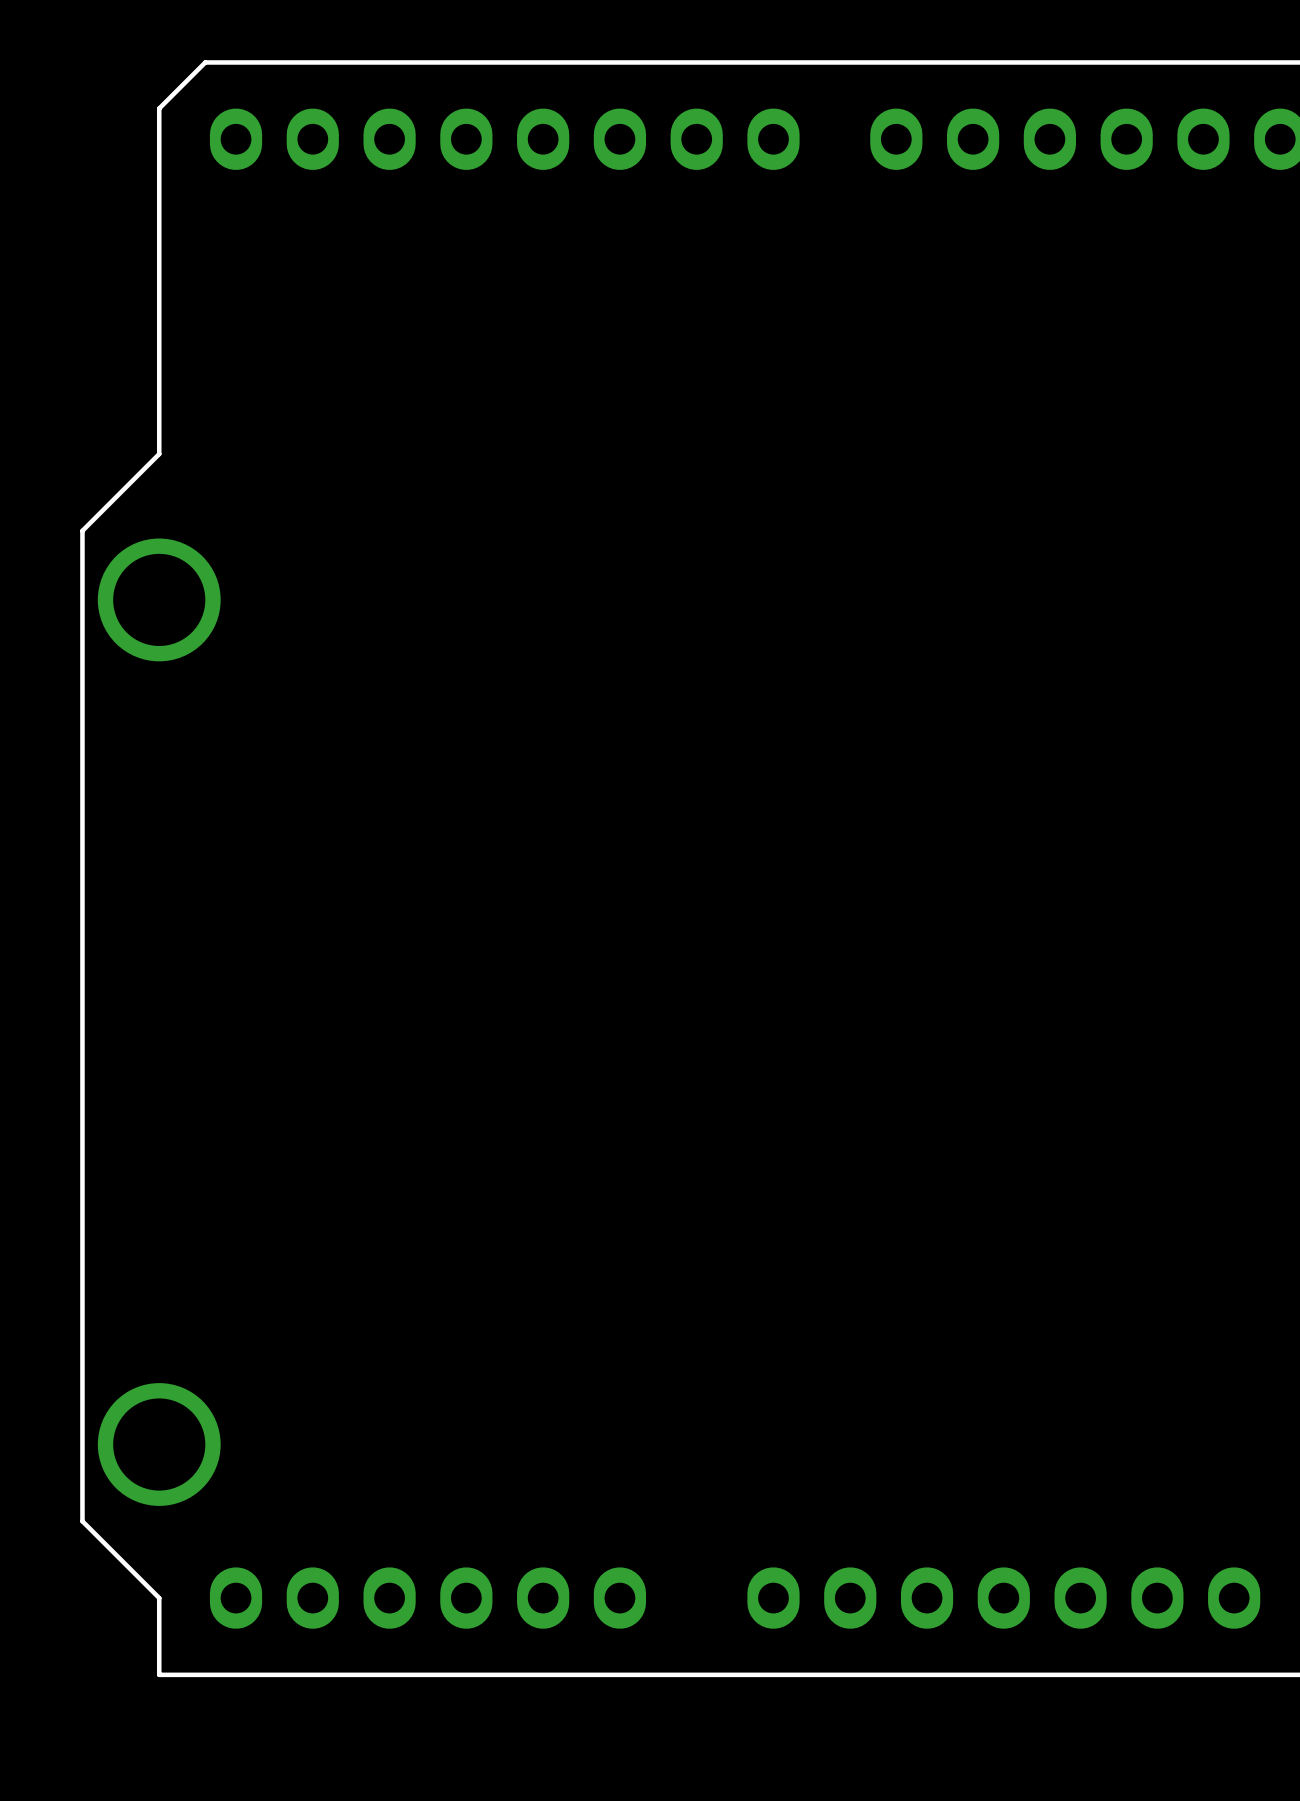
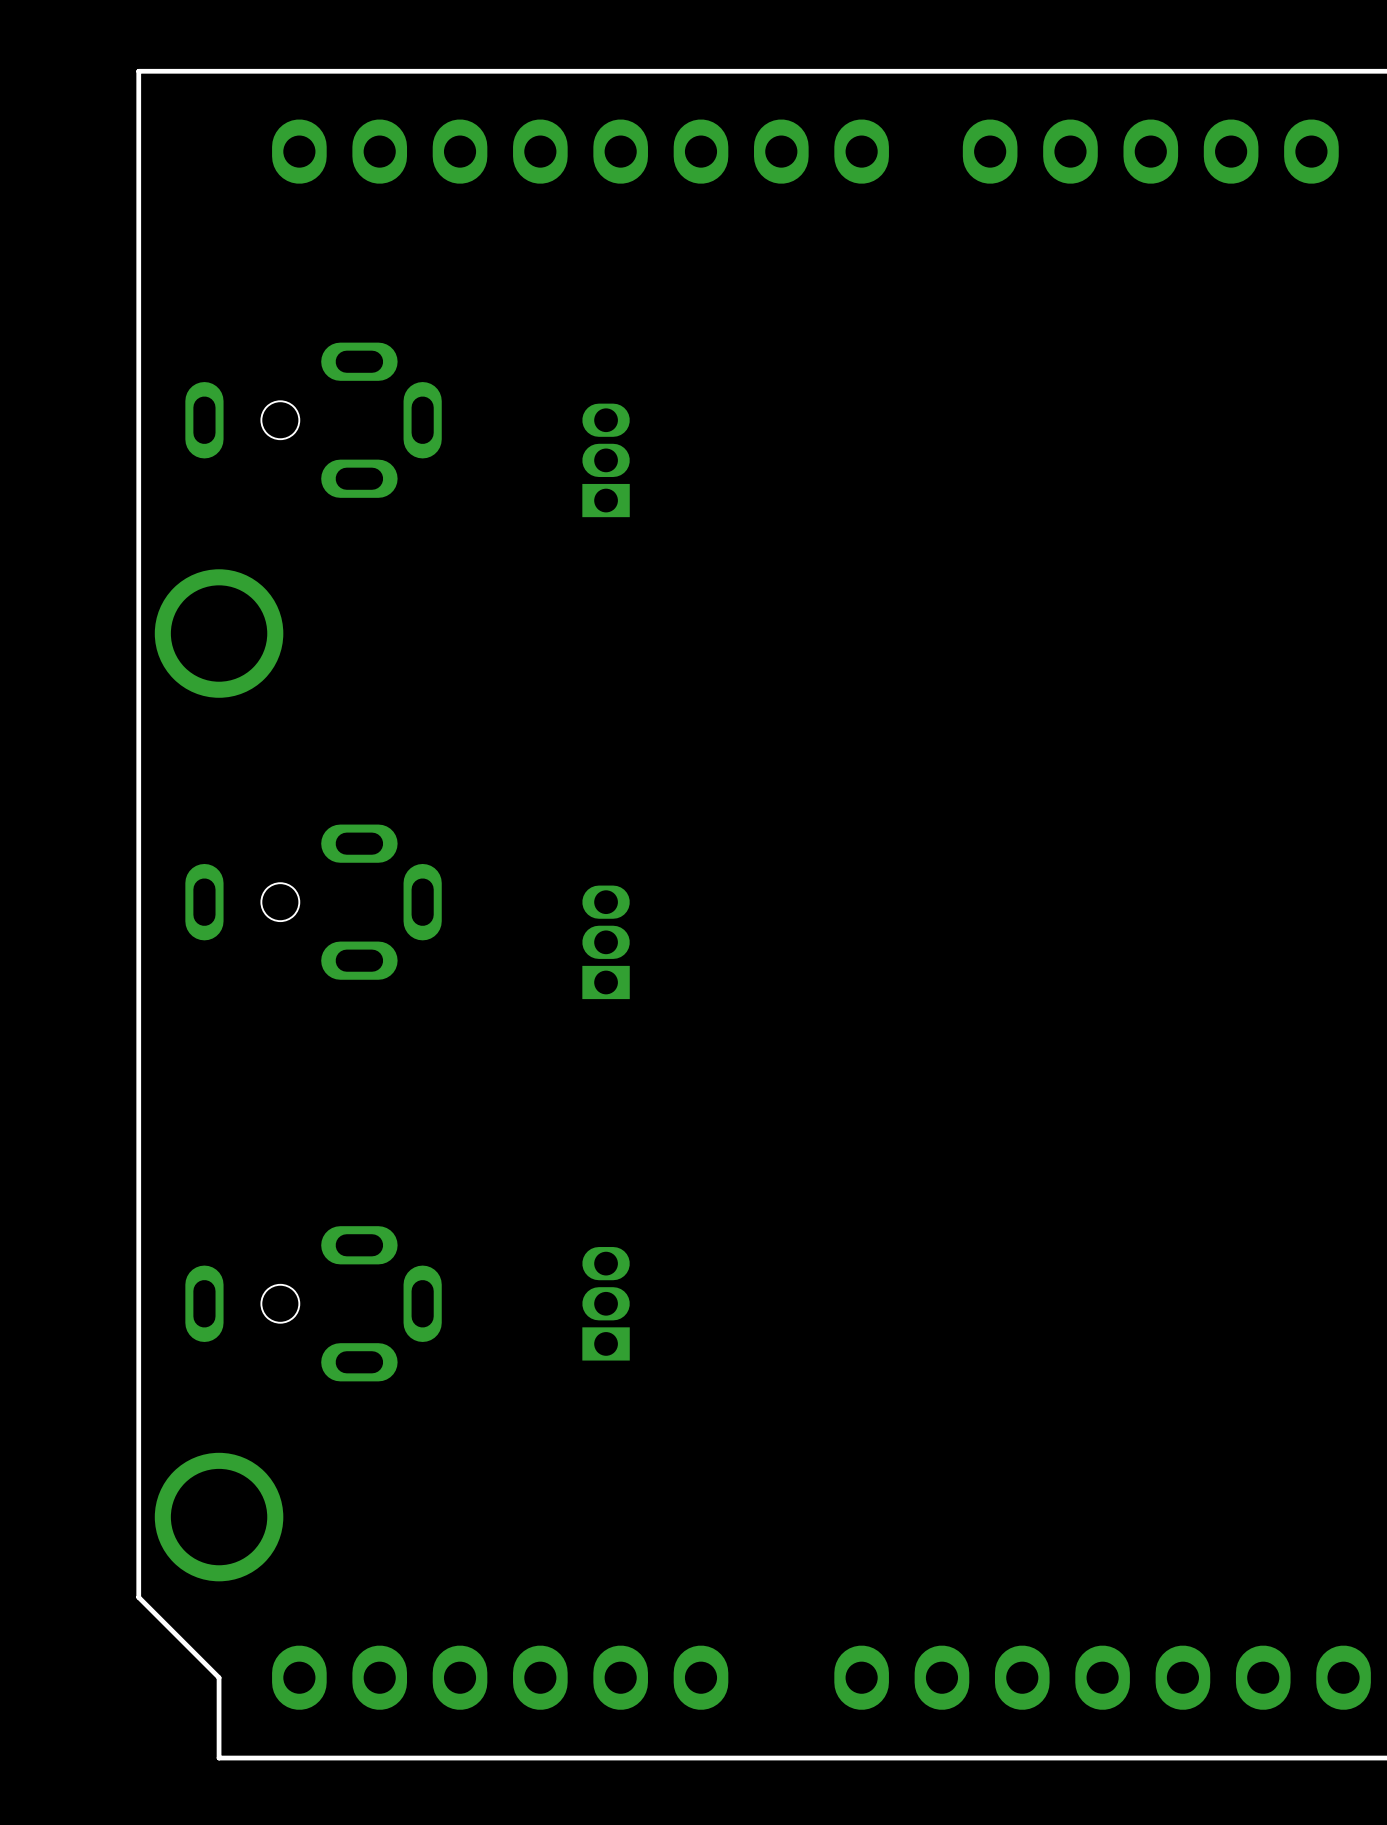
board edge: (205, 62) (159, 108) (159, 454) (82, 530) -> (267, 71) (138, 71) (138, 561)
part: none -> (313, 420)
part: none -> (606, 460)
part: none -> (313, 902)
part: none -> (606, 942)
part: none -> (313, 1303)
part: none -> (606, 1303)

